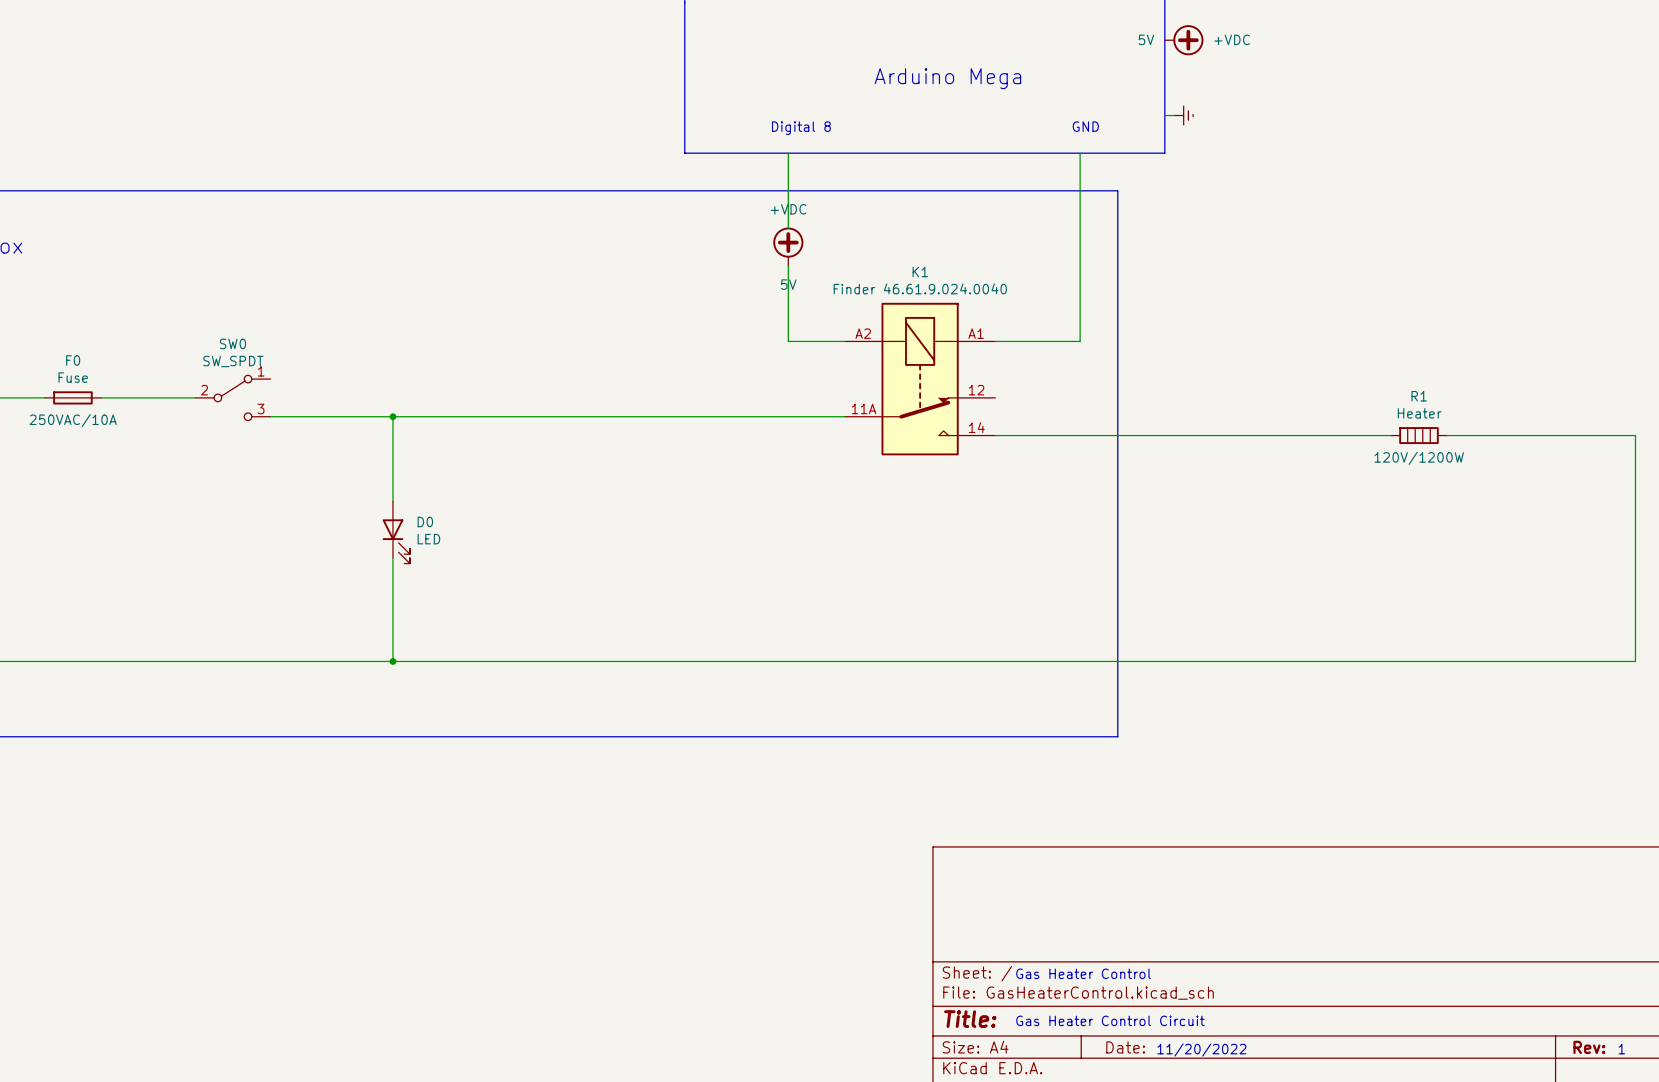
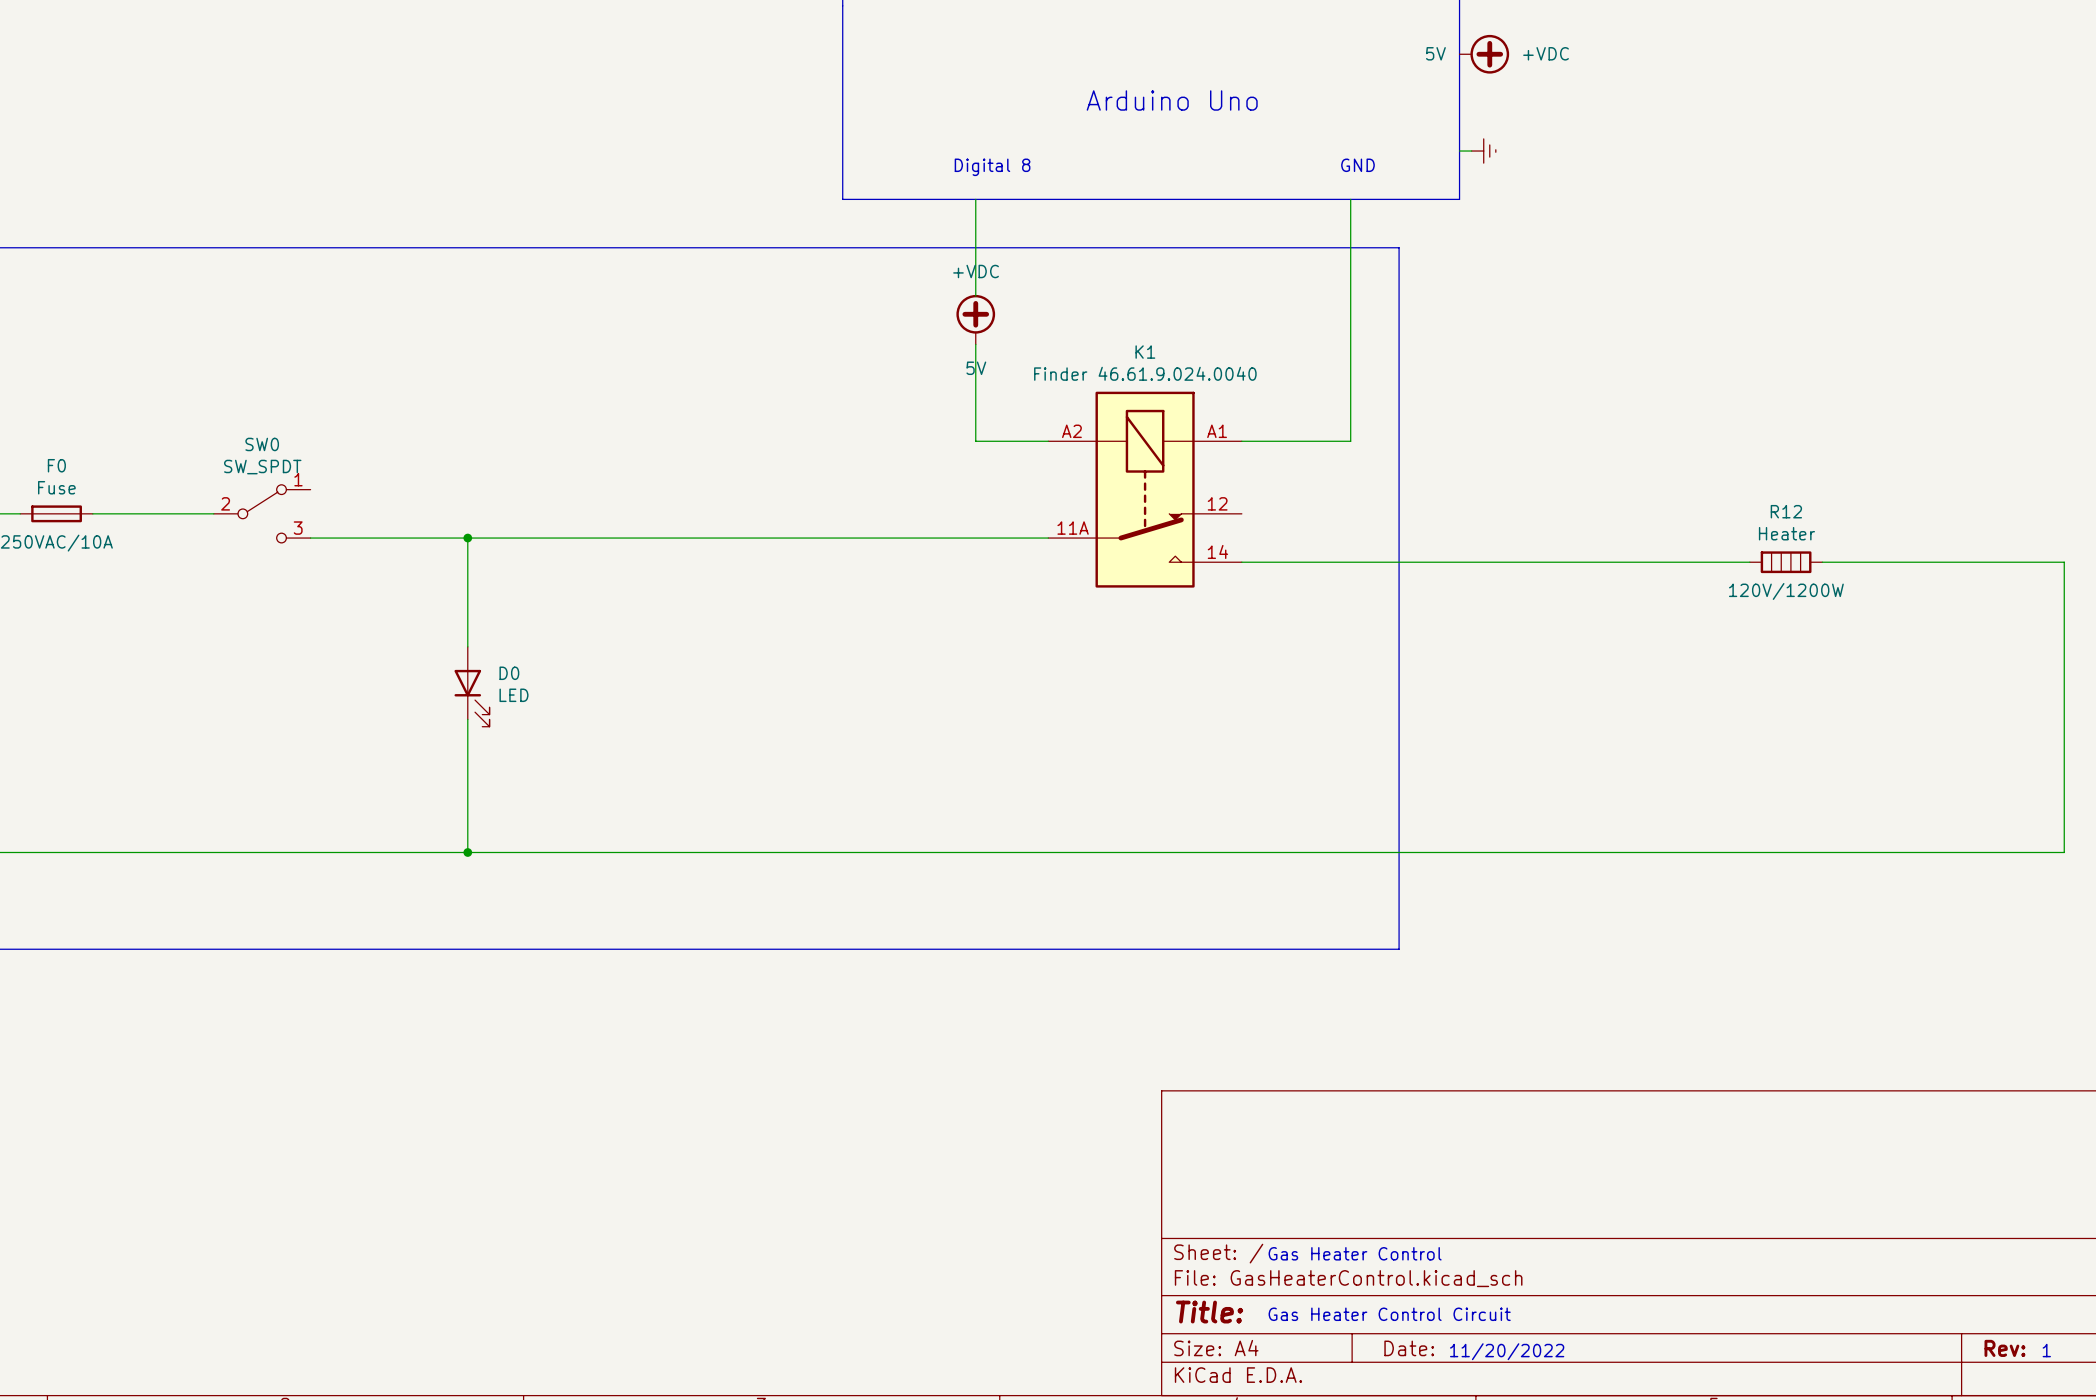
text: Arduino Mega (947, 78) -> Arduino Uno (1172, 100)
R1 name: R1 (1419, 396) -> R12 (1786, 511)

